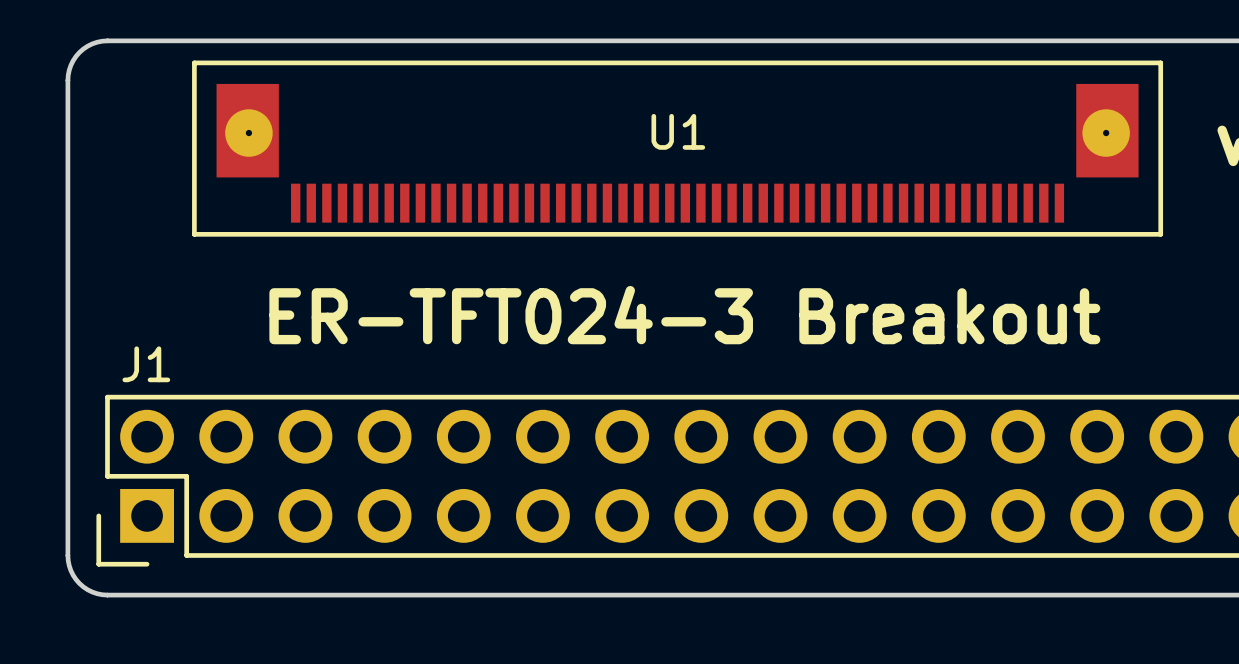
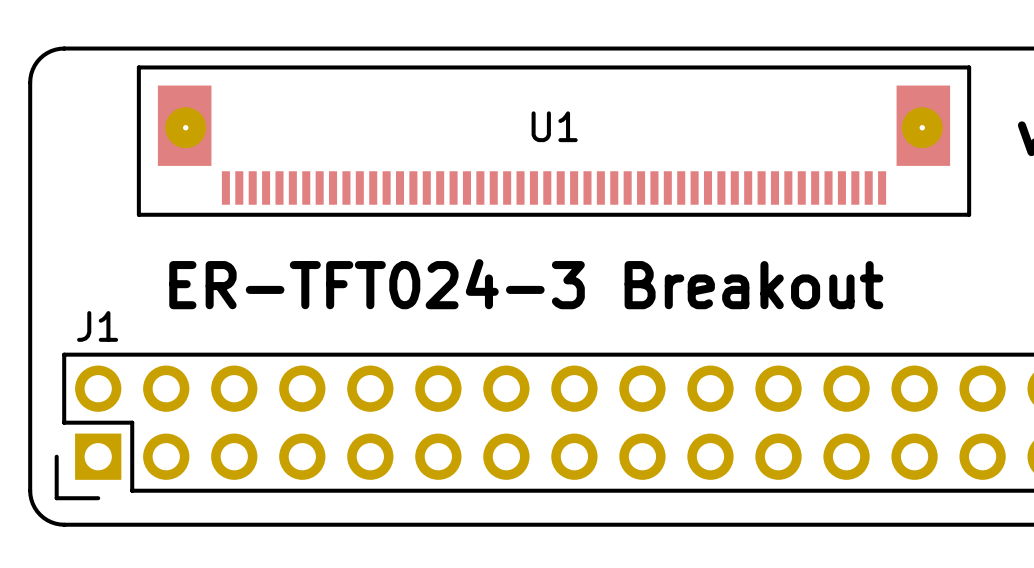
text position: ER-TFT024-3 Breakout (684, 315) -> ER-TFT024-3 Breakout (526, 284)

